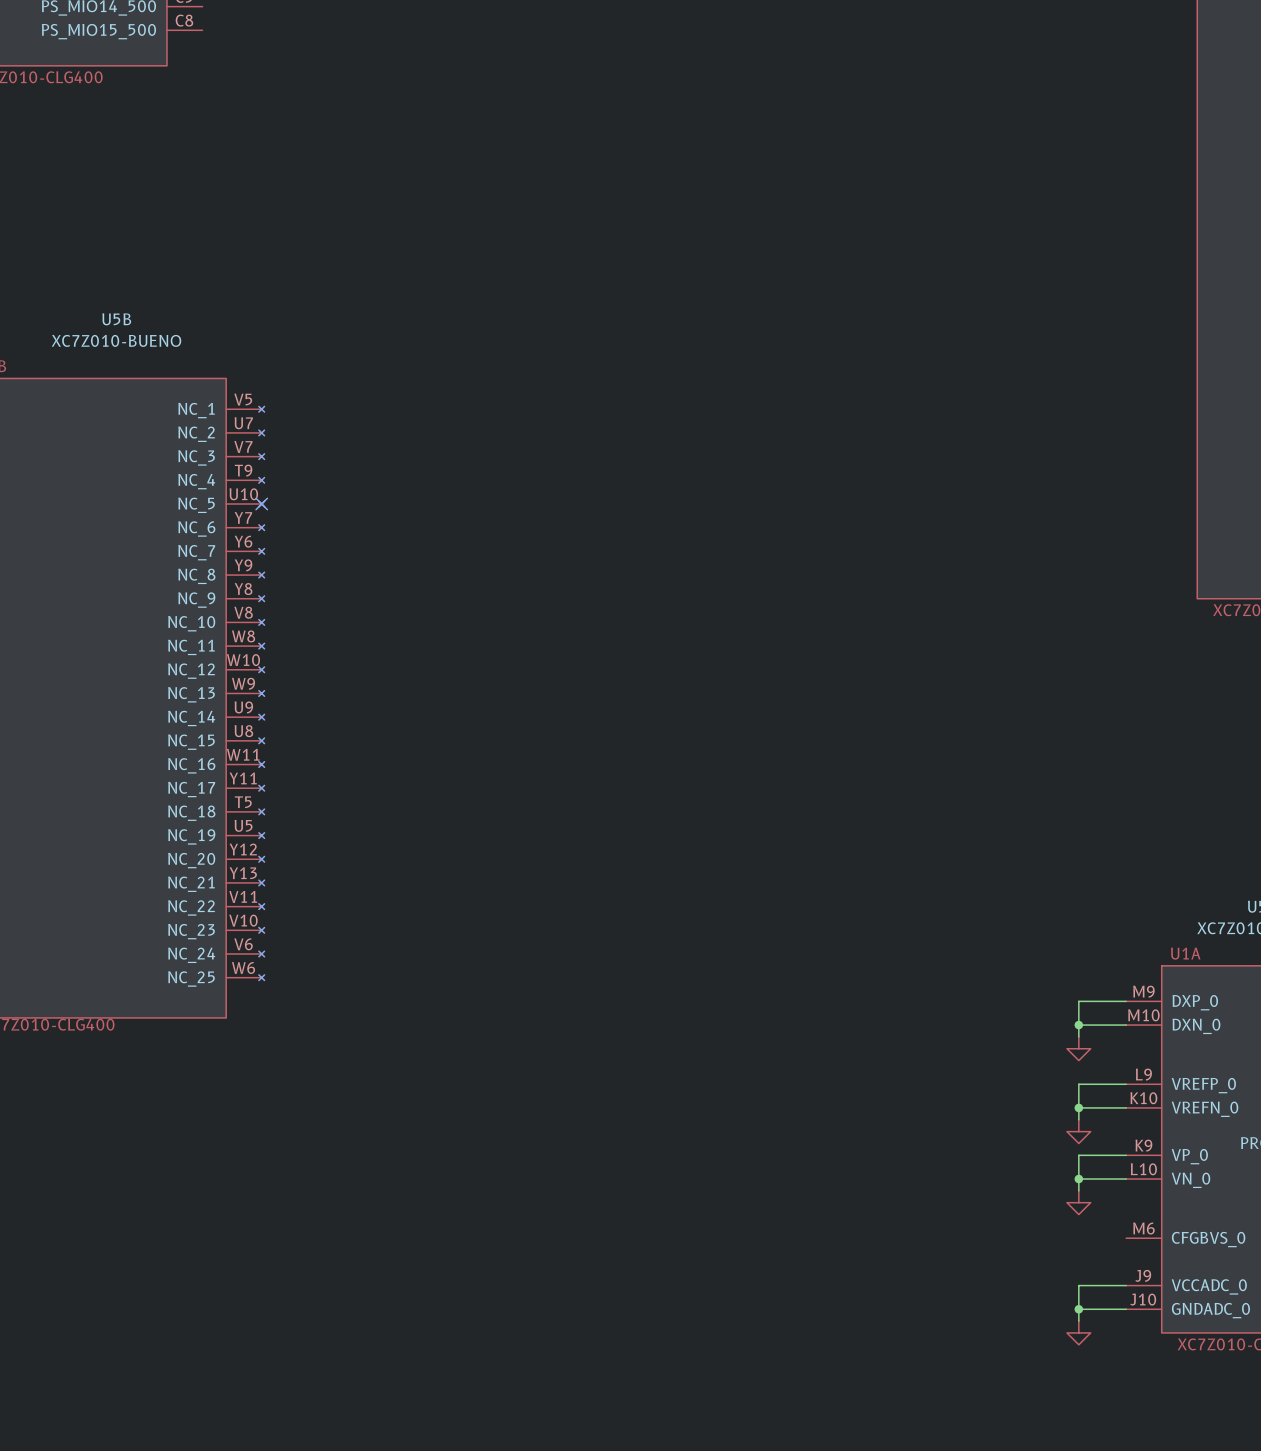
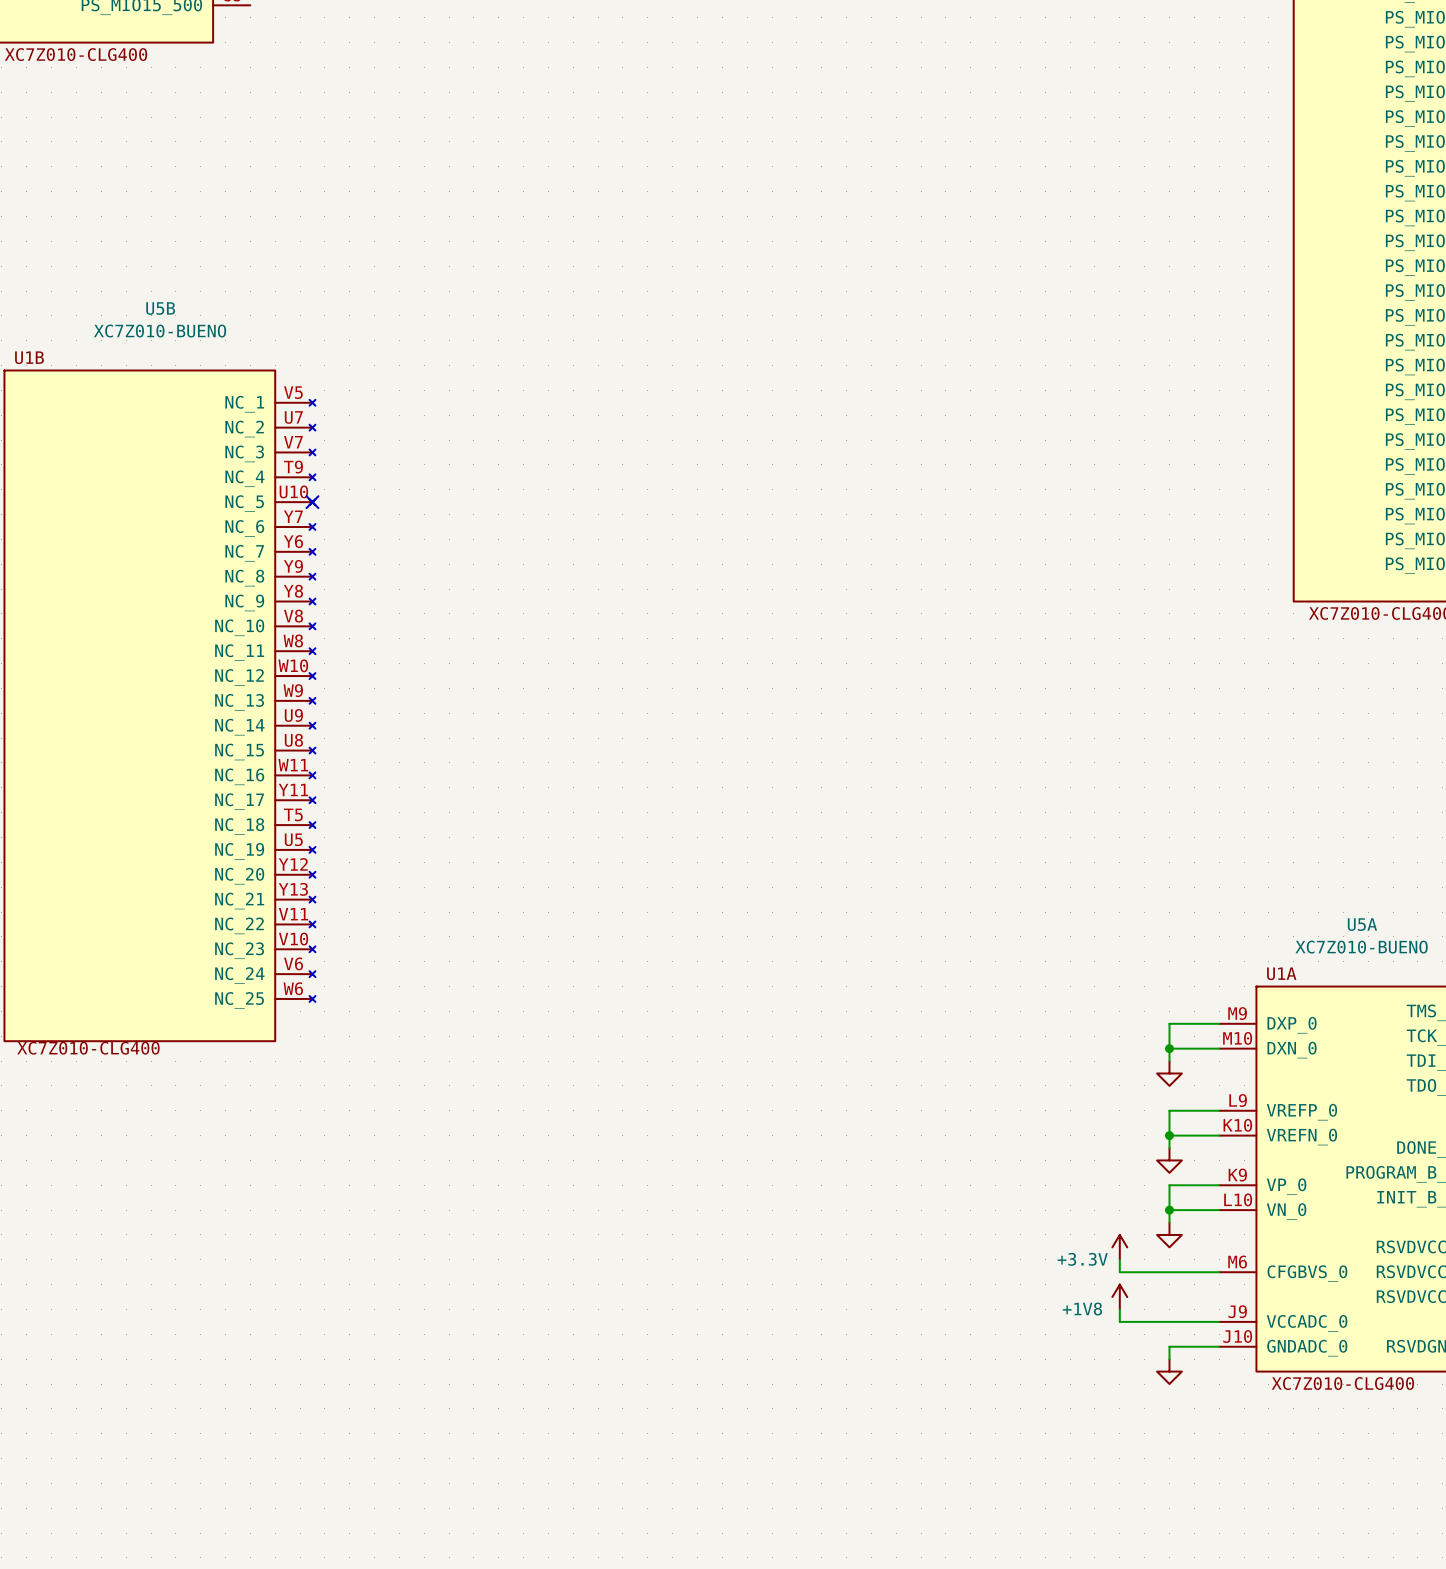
power symbol: none -> +3.3V (1119, 1247)
wire: none -> (1119, 1259) (1119, 1272) (1219, 1272)
power symbol: none -> +1V8 (1119, 1297)
wire: (1078, 1285) (1078, 1309) -> (1169, 1321) (1119, 1321) (1119, 1309)
junction: (1078, 1309) -> none

